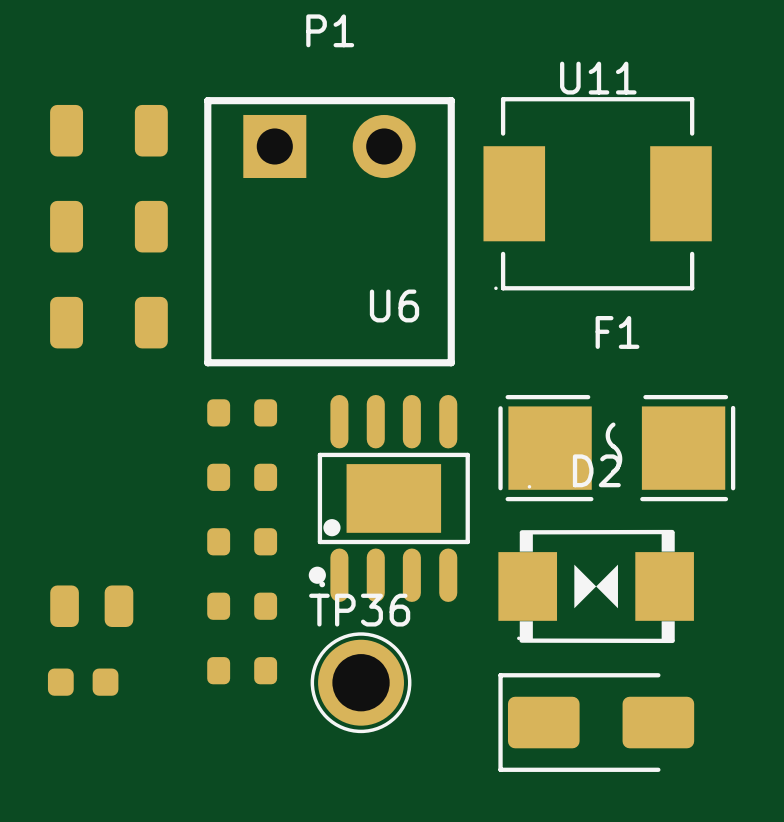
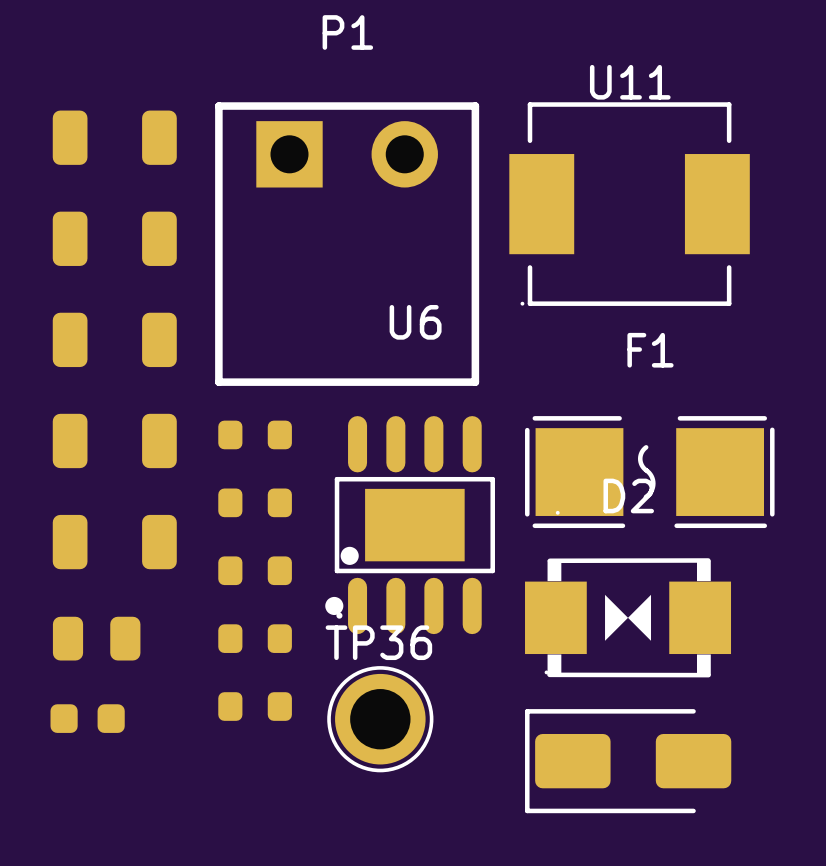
part: none -> (114, 440)
part: none -> (114, 542)

